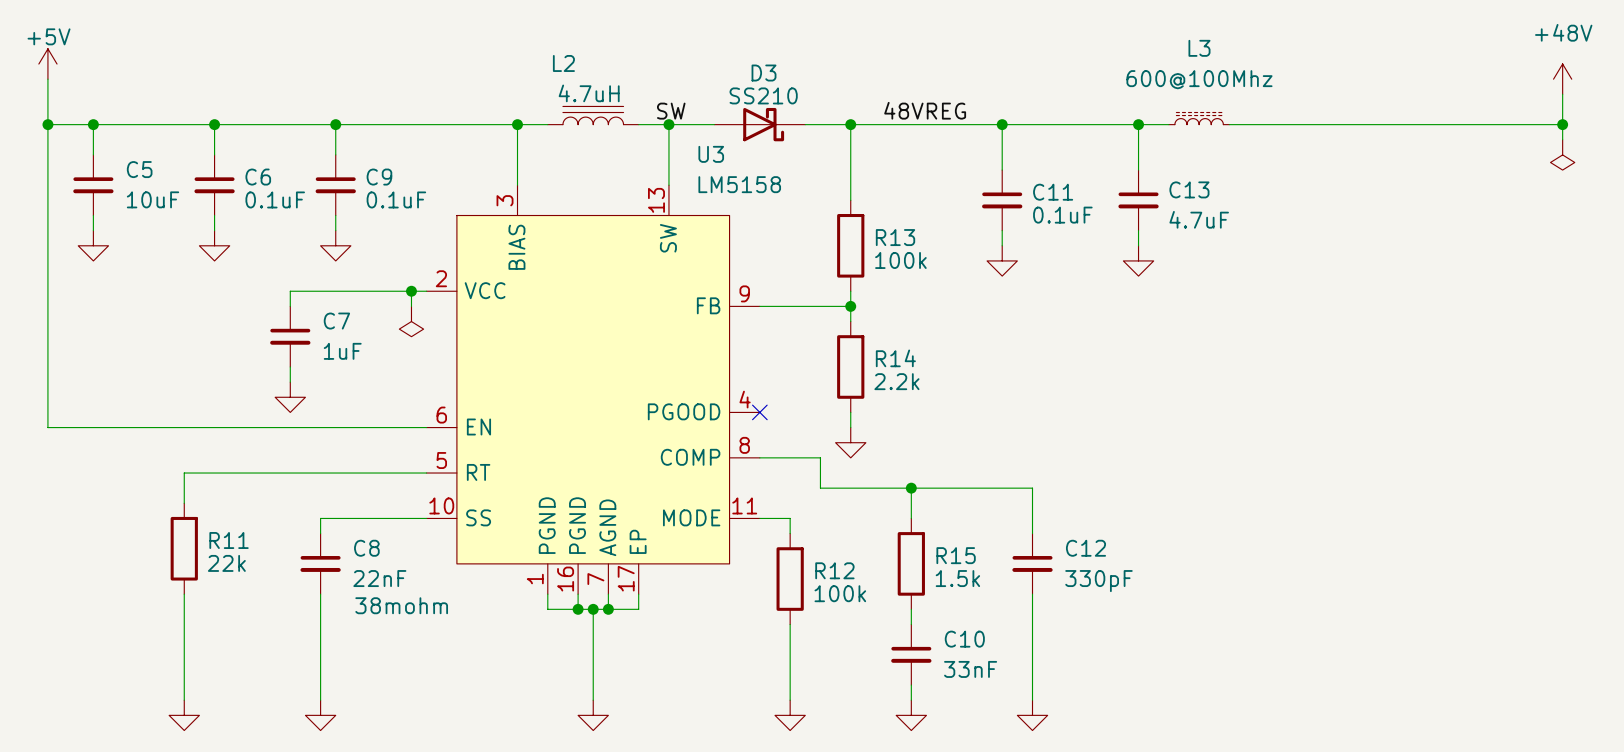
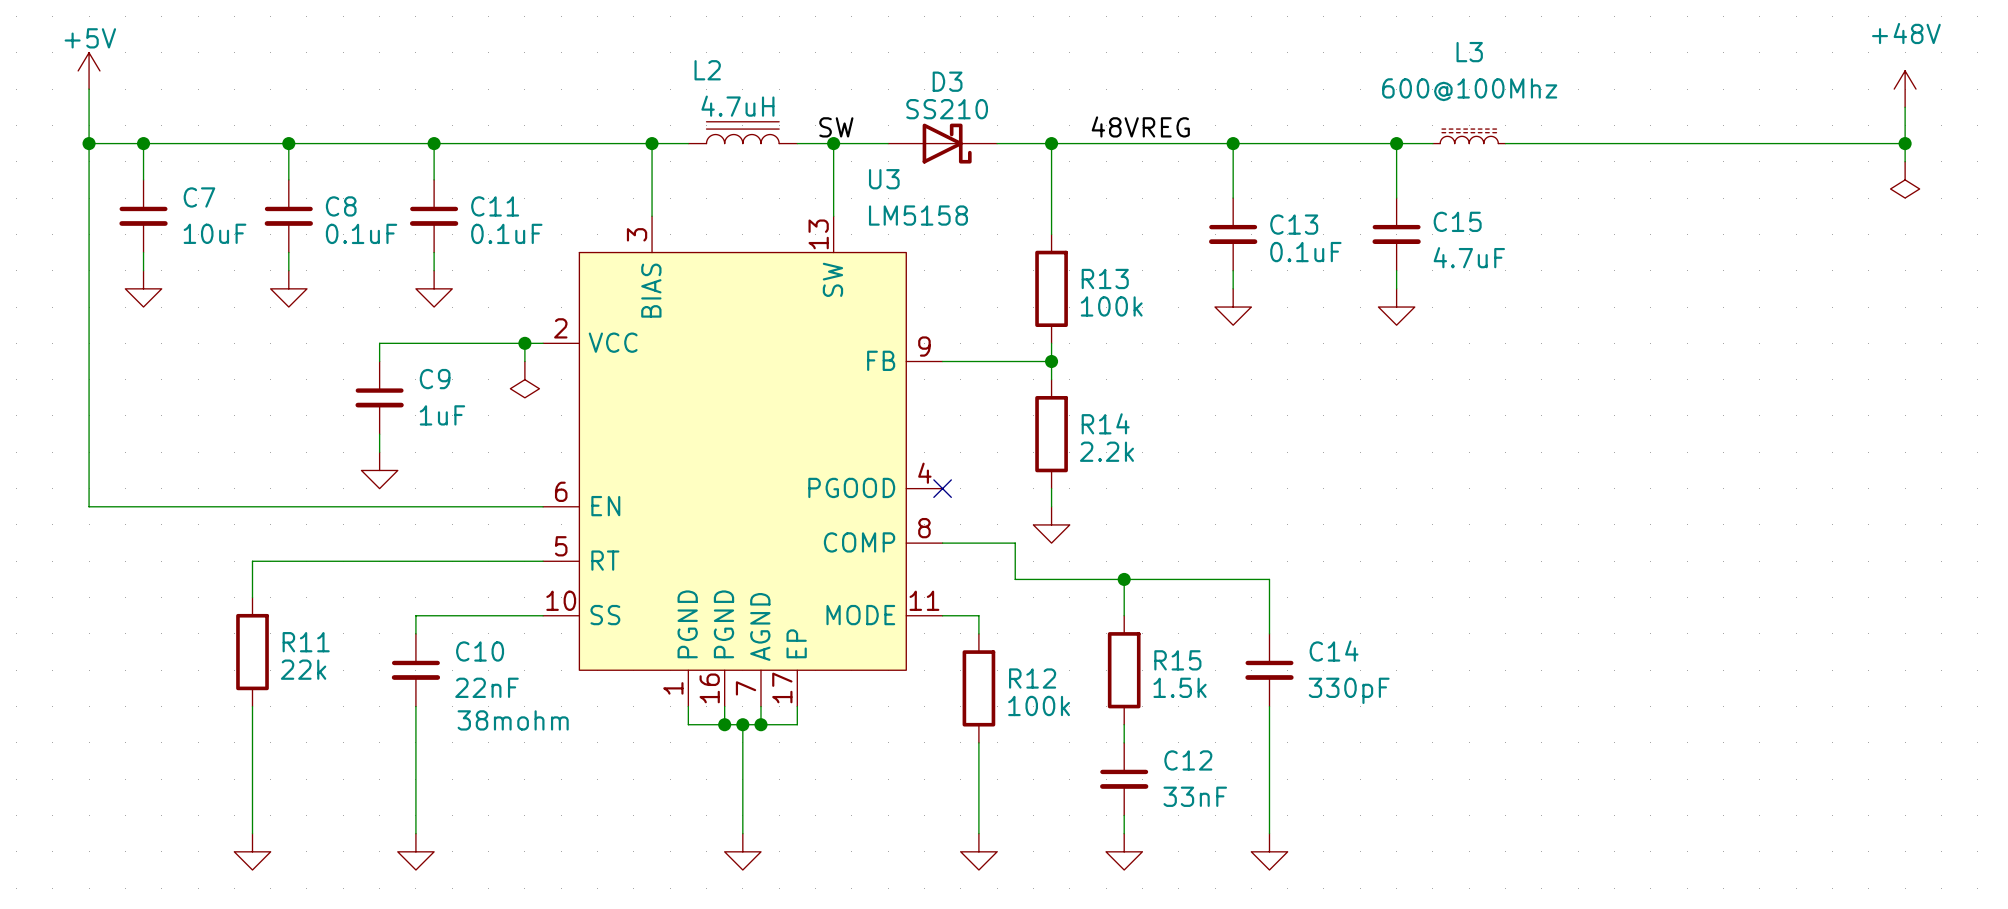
C5 name: C5 (139, 169) -> C7 (199, 197)
C6 name: C6 (258, 177) -> C8 (341, 206)
C9 name: C9 (379, 177) -> C11 (495, 206)
C13 name: C13 (1189, 189) -> C15 (1457, 221)
C11 name: C11 (1053, 192) -> C13 (1294, 224)
C7 name: C7 (336, 321) -> C9 (435, 379)
C8 name: C8 (366, 548) -> C10 (480, 651)
C12 name: C12 (1085, 548) -> C14 (1334, 651)
C10 name: C10 (964, 639) -> C12 (1188, 760)

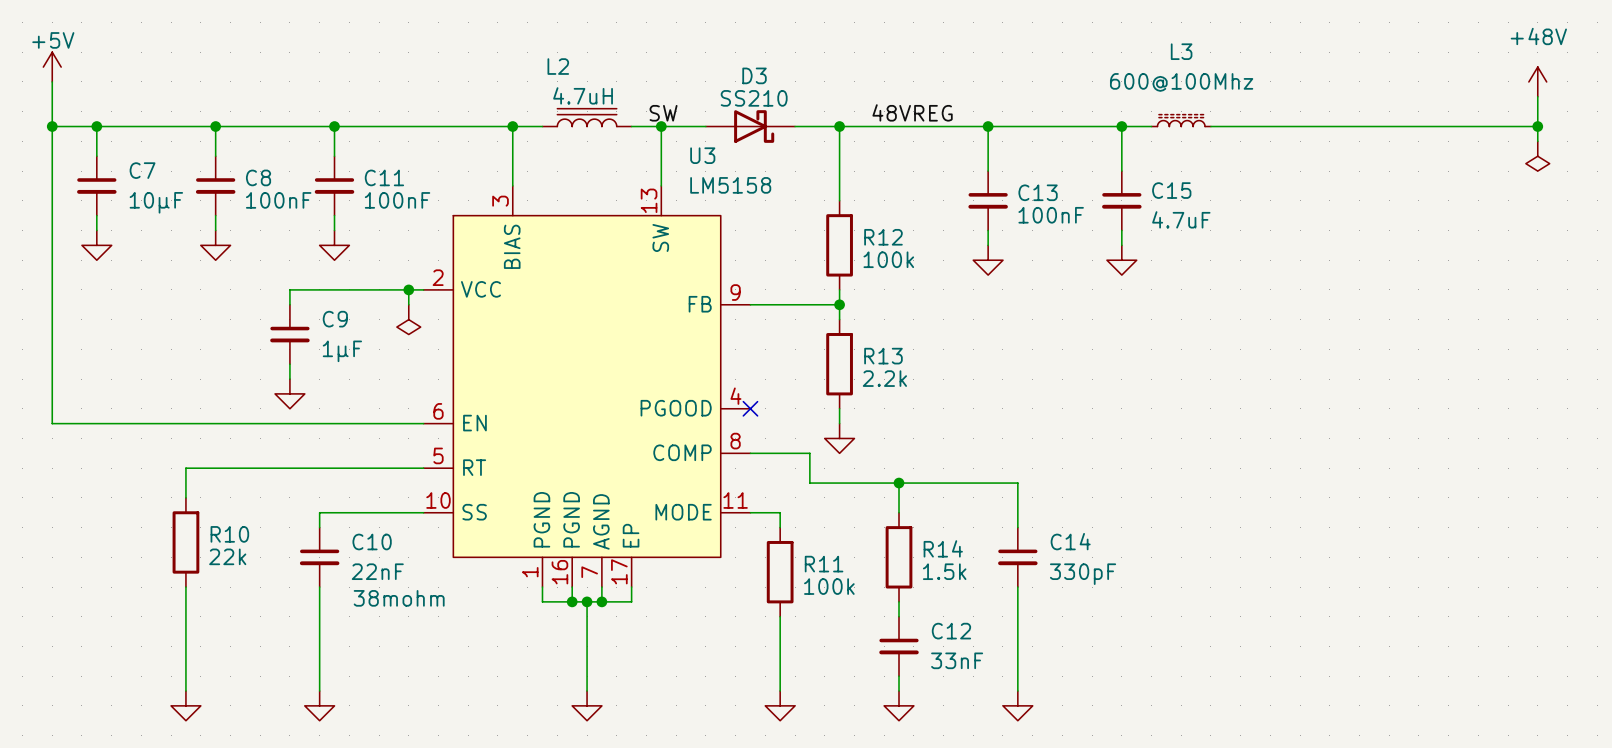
C7 value: 10uF (215, 233) -> 10μF (156, 202)
C8 value: 0.1uF (361, 233) -> 100nF (278, 200)
C11 value: 0.1uF (506, 233) -> 100nF (397, 200)
C13 value: 0.1uF (1305, 252) -> 100nF (1051, 215)
R13 name: R13 (1105, 278) -> R12 (883, 237)
C9 value: 1uF (442, 415) -> 1μF (342, 351)
R14 name: R14 (1105, 423) -> R13 (883, 356)
R11 name: R11 (306, 642) -> R10 (229, 534)
R15 name: R15 (1177, 660) -> R14 (943, 548)
R12 name: R12 (1032, 678) -> R11 (824, 564)

